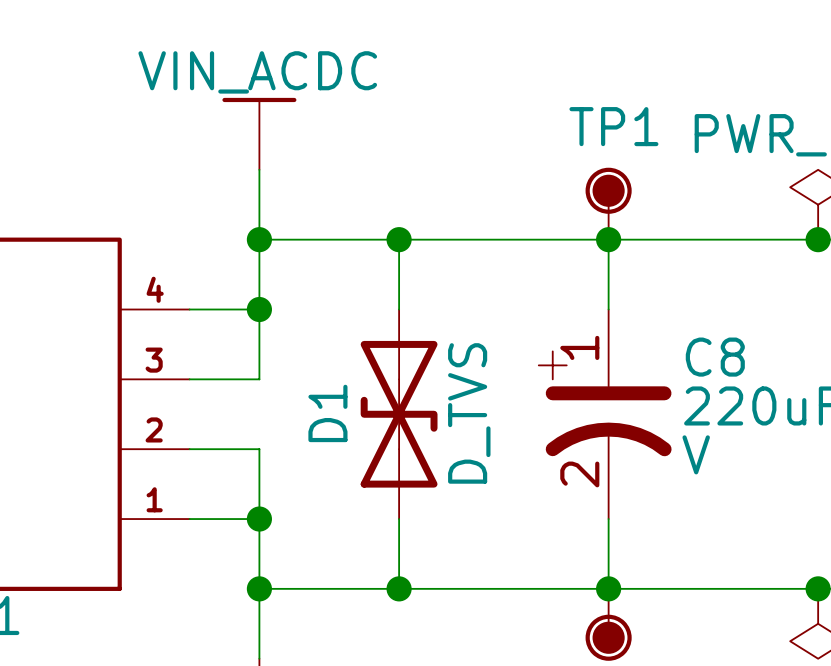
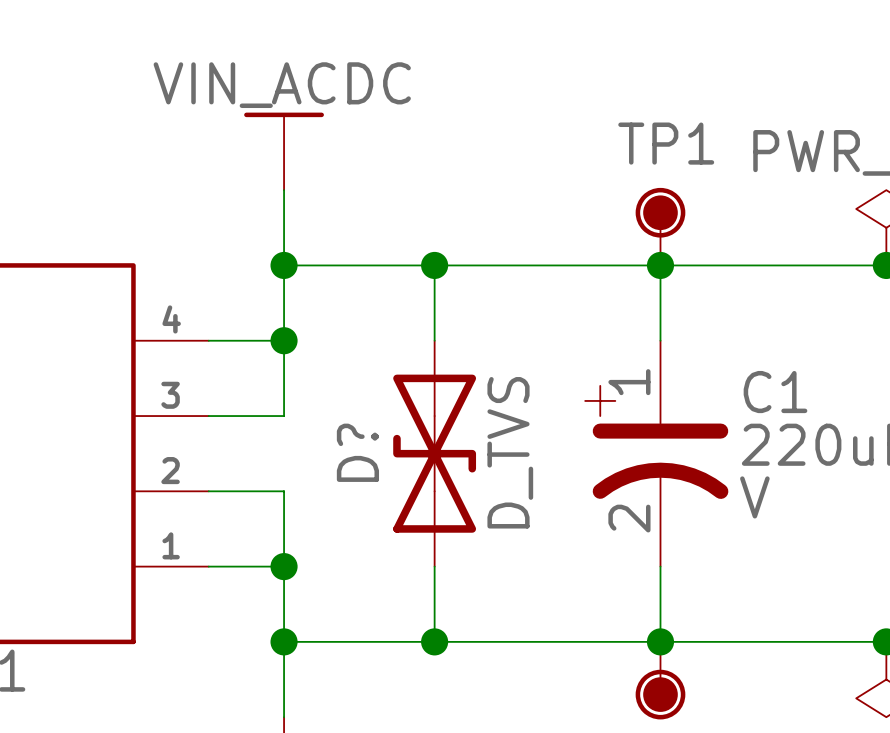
C8 name: C8 (715, 357) -> C1 (775, 392)
D1 name: D1 (327, 413) -> D? (357, 452)

